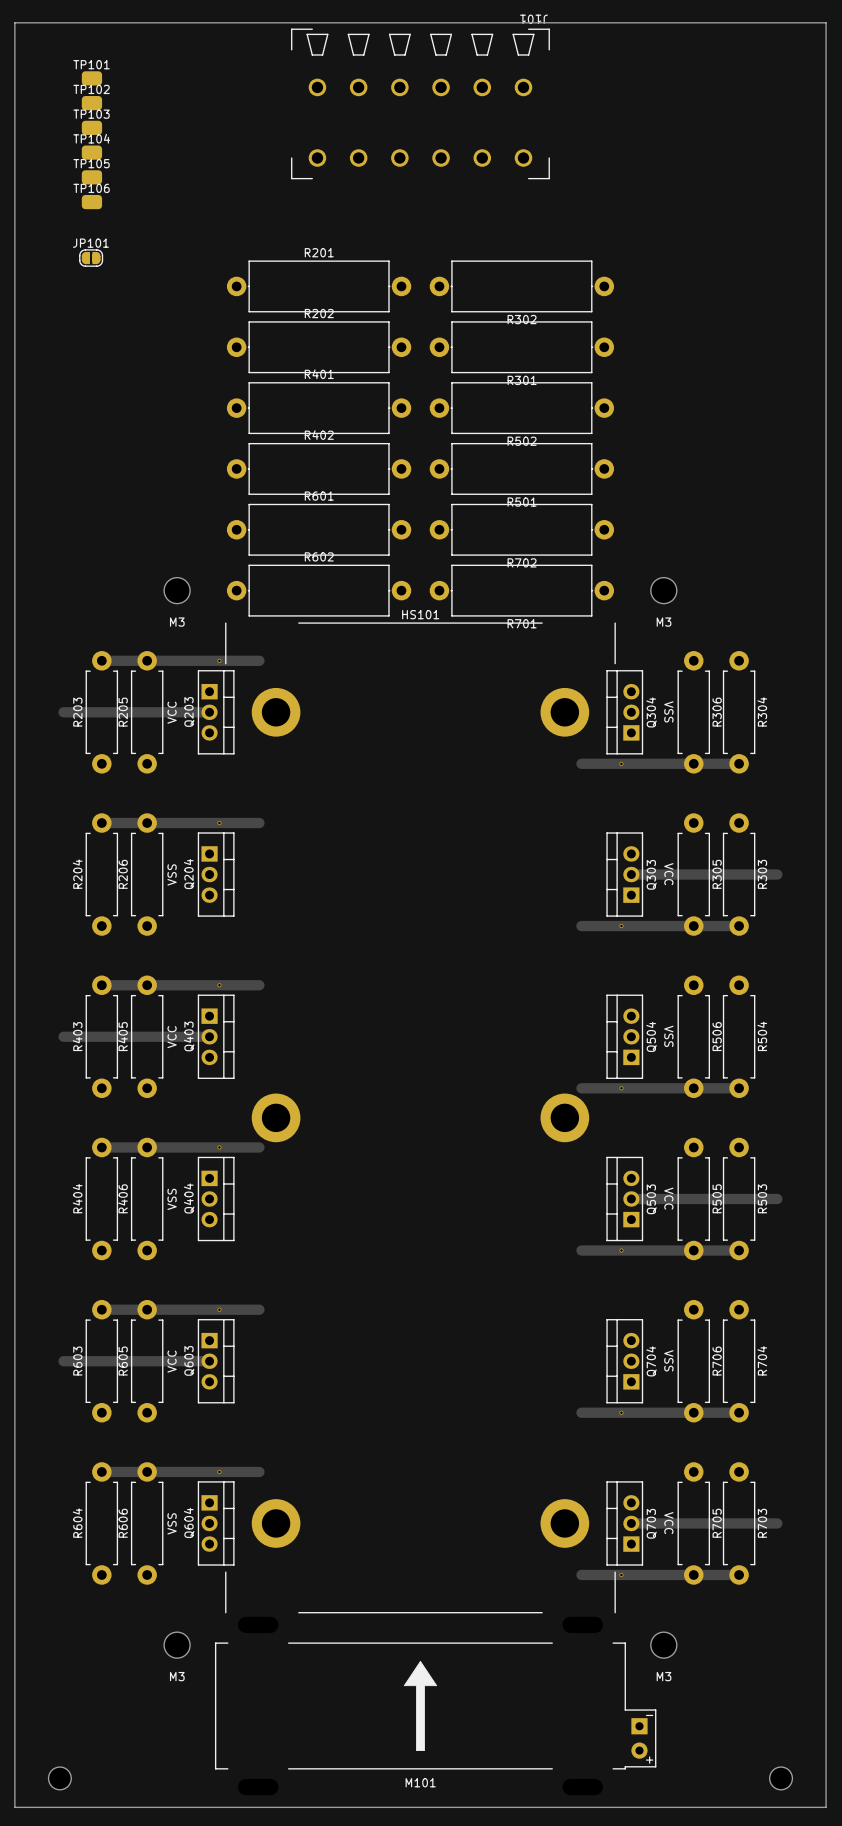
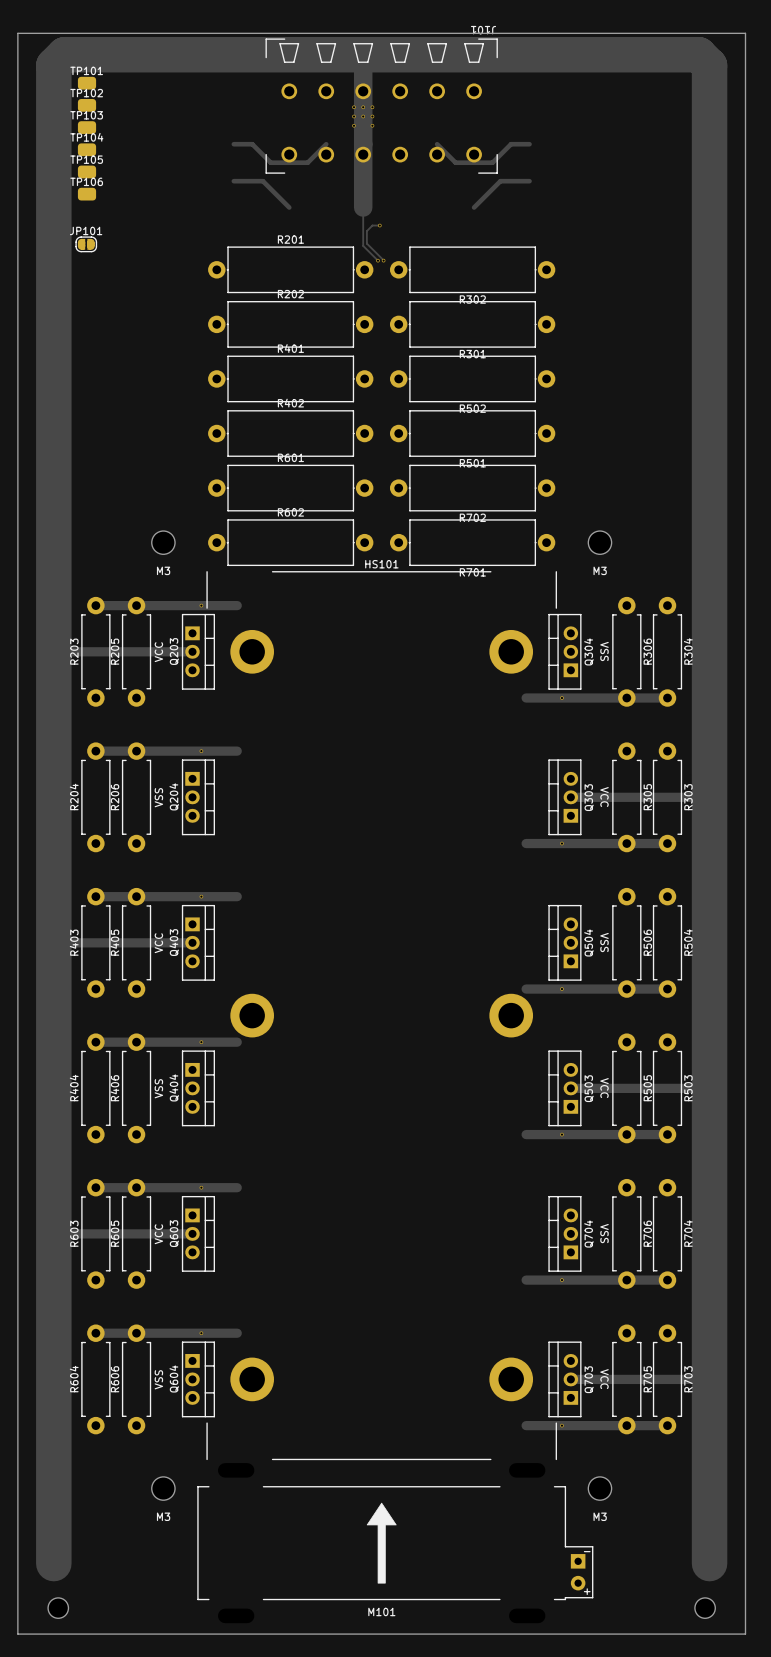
track: none -> (363, 54) (363, 245) (377, 260)
via: none -> (353, 107)
via: none -> (363, 107)
via: none -> (372, 107)
via: none -> (353, 116)
via: none -> (363, 116)
via: none -> (372, 116)
via: none -> (353, 125)
via: none -> (372, 125)
track: none -> (233, 144) (252, 144) (270, 162) (307, 162) (326, 144)
track: none -> (437, 144) (455, 162) (492, 162) (511, 144) (529, 144)
track: none -> (233, 181) (262, 181) (289, 207)
track: none -> (529, 181) (500, 181) (474, 207)
track: none -> (379, 225) (372, 225) (366, 231) (366, 243) (383, 260)
via: none -> (379, 225)
via: none -> (377, 260)
via: none -> (383, 260)
track: none -> (53, 1563) (53, 65) (64, 54) (698, 54) (709, 65) (709, 1563)

